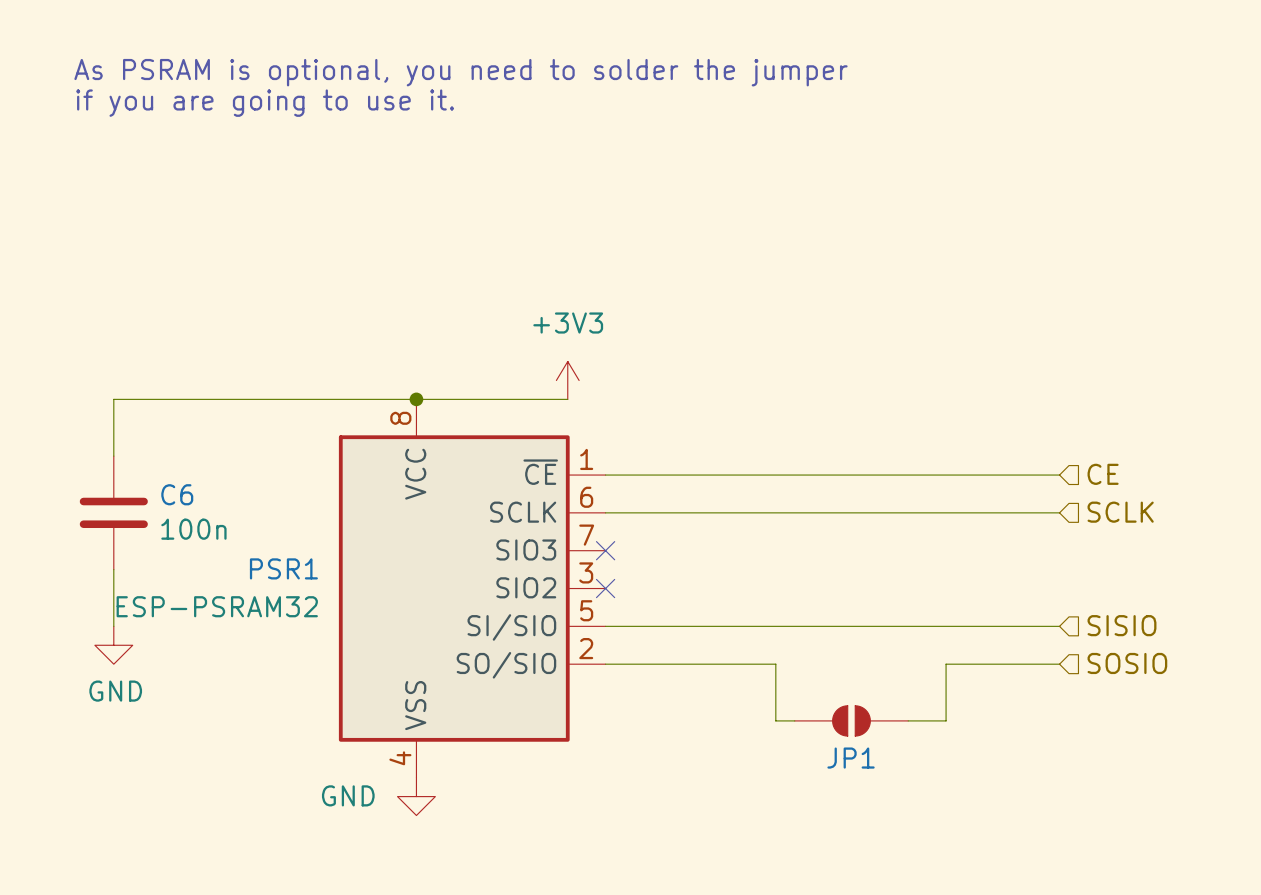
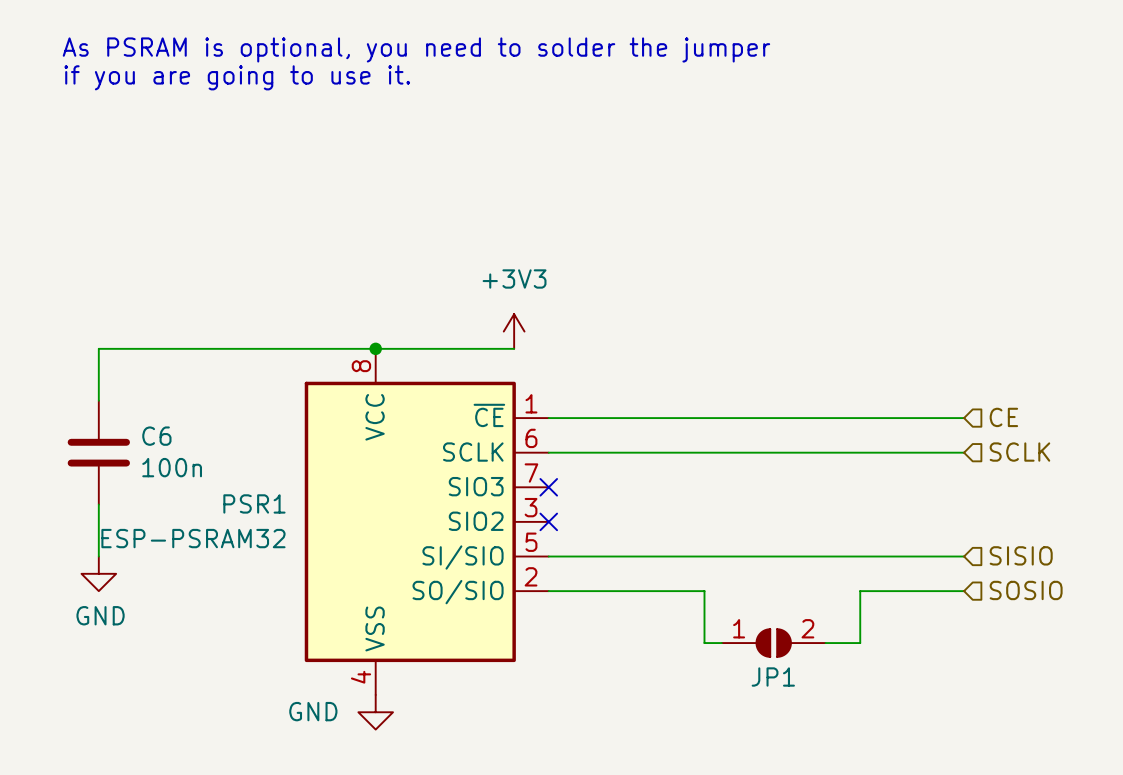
JP1 pin number: none -> 1 (739, 628)
JP1 pin number: none -> 2 (807, 628)

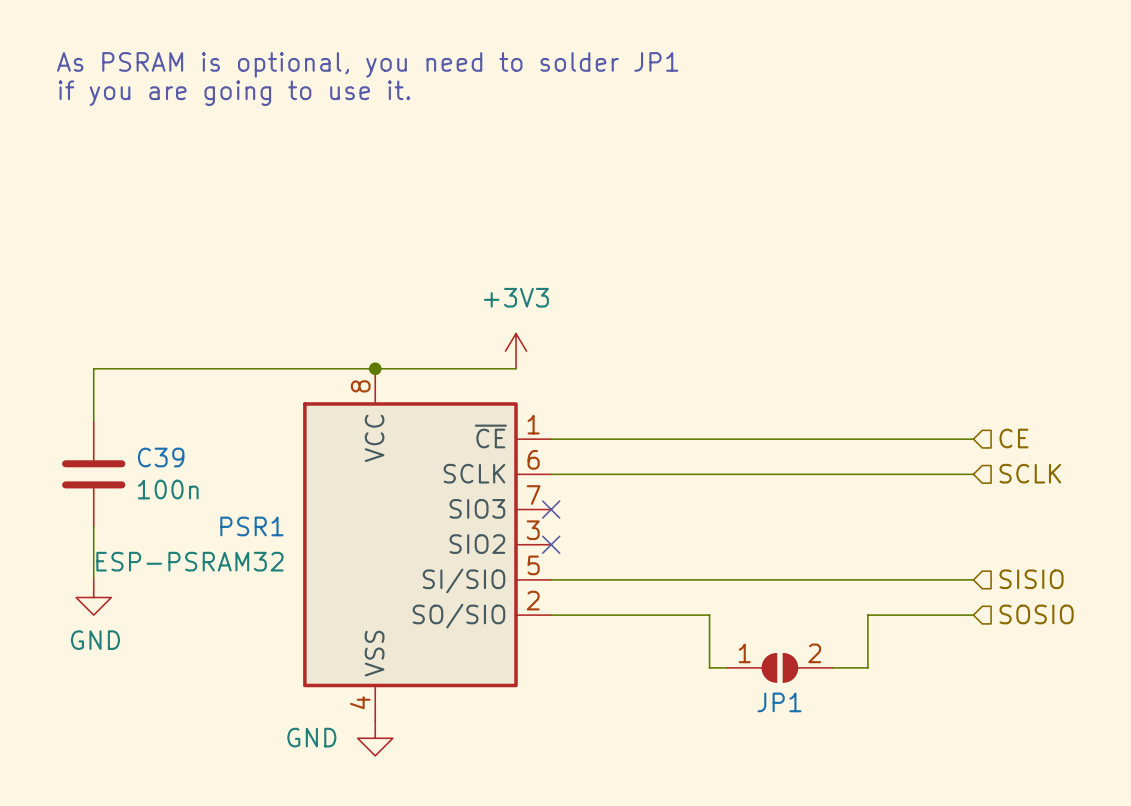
text: As PSRAM is optional, you need to solder the jumper (416, 49) -> As PSRAM is optional, you need to solder JP1 (367, 64)
C6 name: C6 (156, 436) -> C39 (161, 457)

